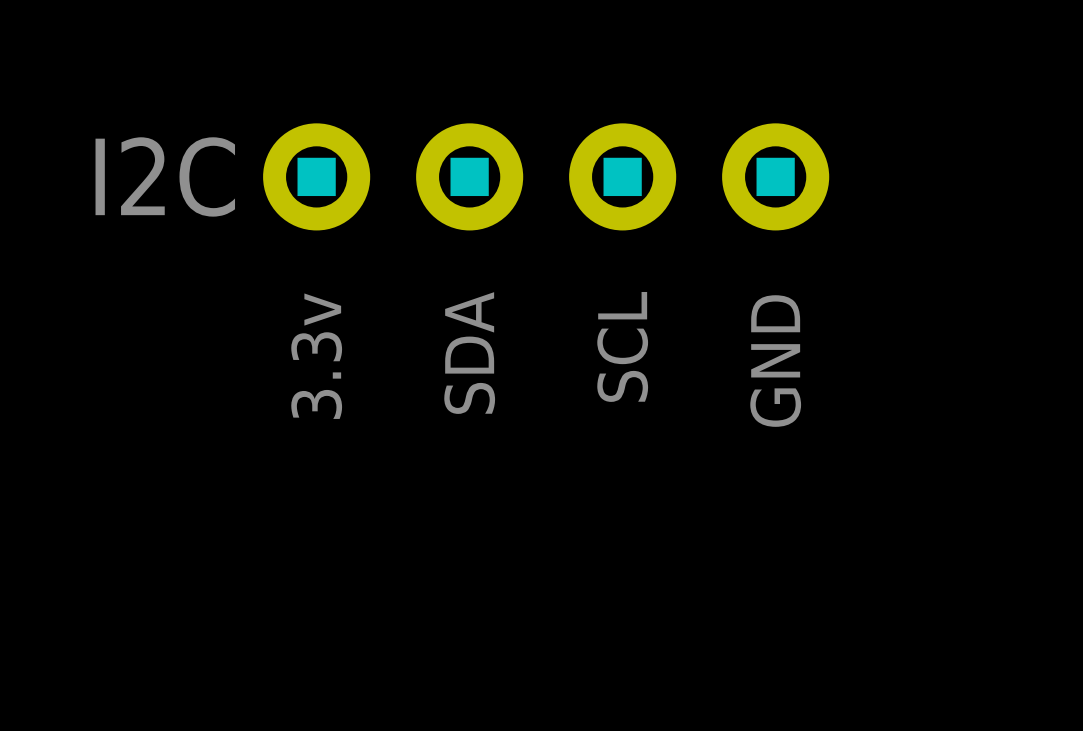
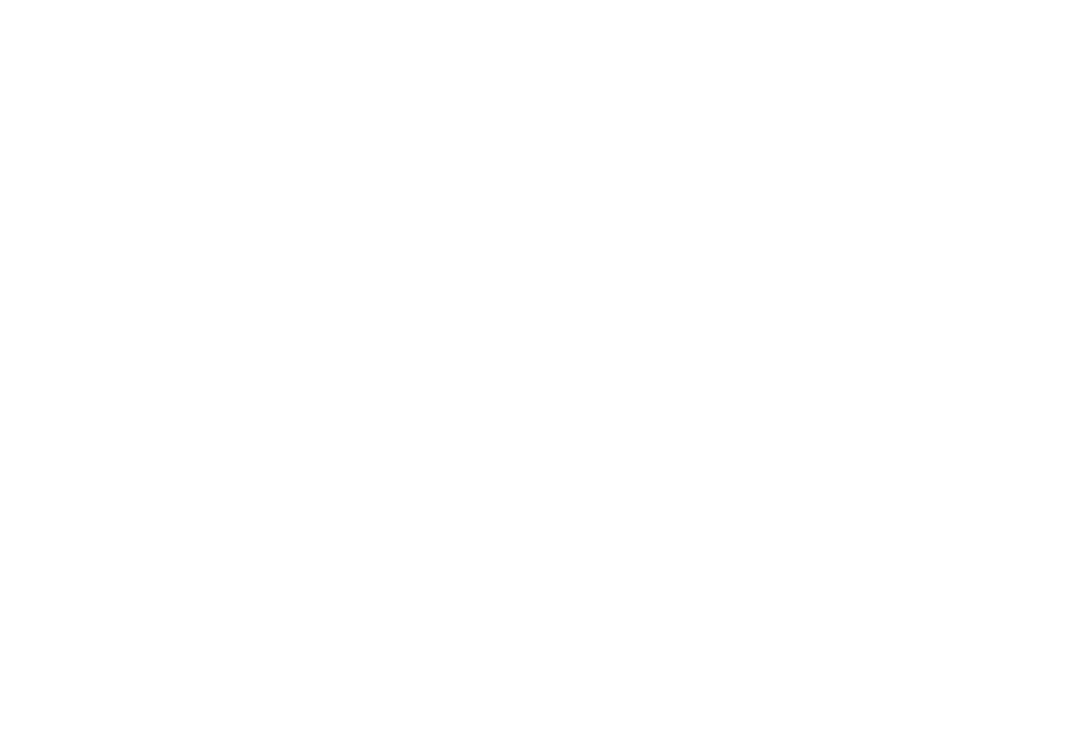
text: I2C (165, 176) -> none
part: (546, 176) -> none
text: SCL (622, 346) -> none
text: SDA (469, 353) -> none
text: 3.3v (316, 356) -> none
text: GND (775, 361) -> none

